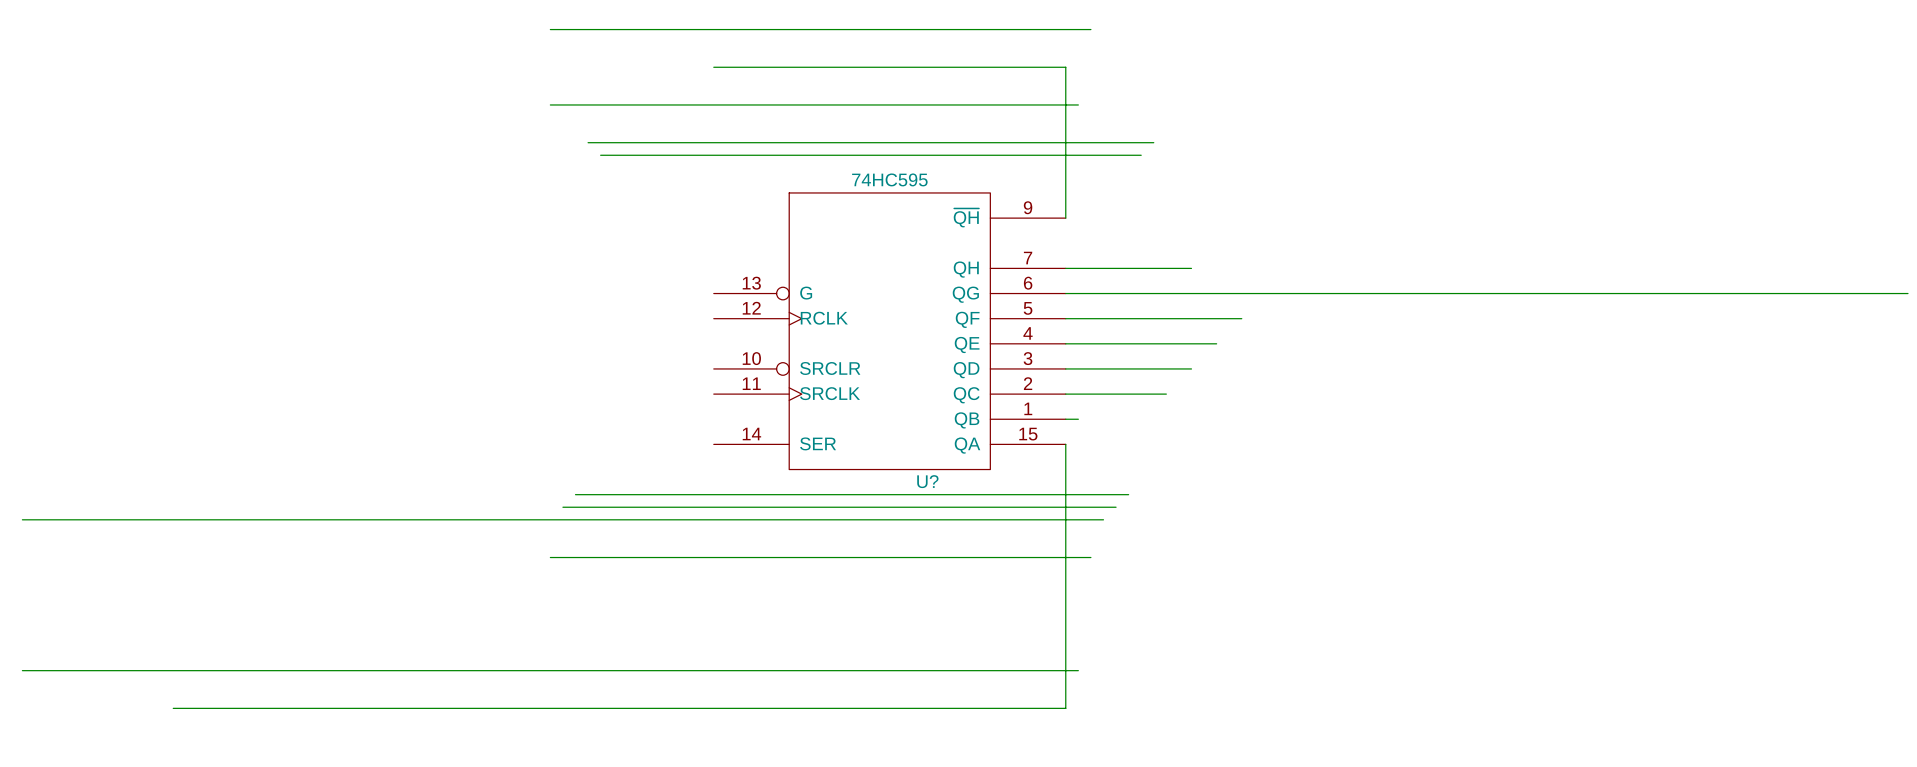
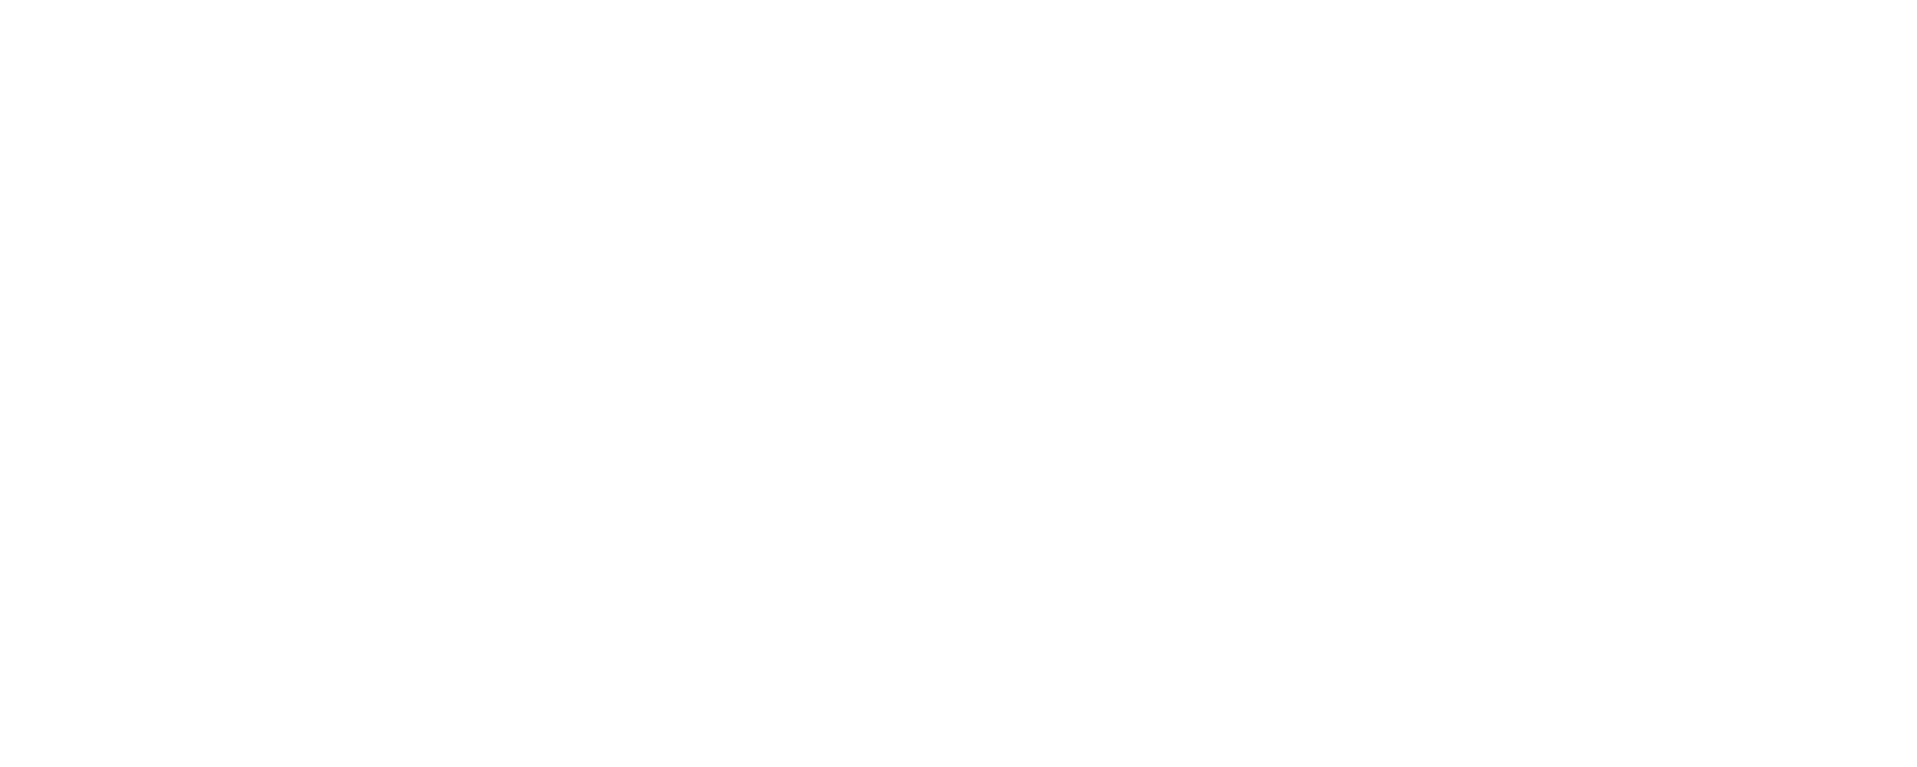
wire: (550, 29) (1090, 29) -> none
wire: (713, 67) (1065, 67) (1065, 218) -> none
wire: (550, 104) (1078, 104) -> none
wire: (588, 142) (1153, 142) -> none
wire: (600, 155) (1141, 155) -> none
wire: (1065, 268) (1191, 268) -> none
wire: (1065, 293) (1907, 293) -> none
wire: (1065, 318) (1241, 318) -> none
U?: 74HC595 (889, 331) -> none
wire: (1065, 343) (1216, 343) -> none
wire: (1065, 368) (1191, 368) -> none
wire: (1065, 394) (1166, 394) -> none
wire: (1065, 419) (1078, 419) -> none
wire: (1065, 444) (1065, 708) (173, 708) -> none
wire: (575, 494) (1128, 494) -> none
wire: (562, 507) (1116, 507) -> none
wire: (22, 519) (1103, 519) -> none
wire: (550, 557) (1090, 557) -> none
wire: (22, 670) (1078, 670) -> none

